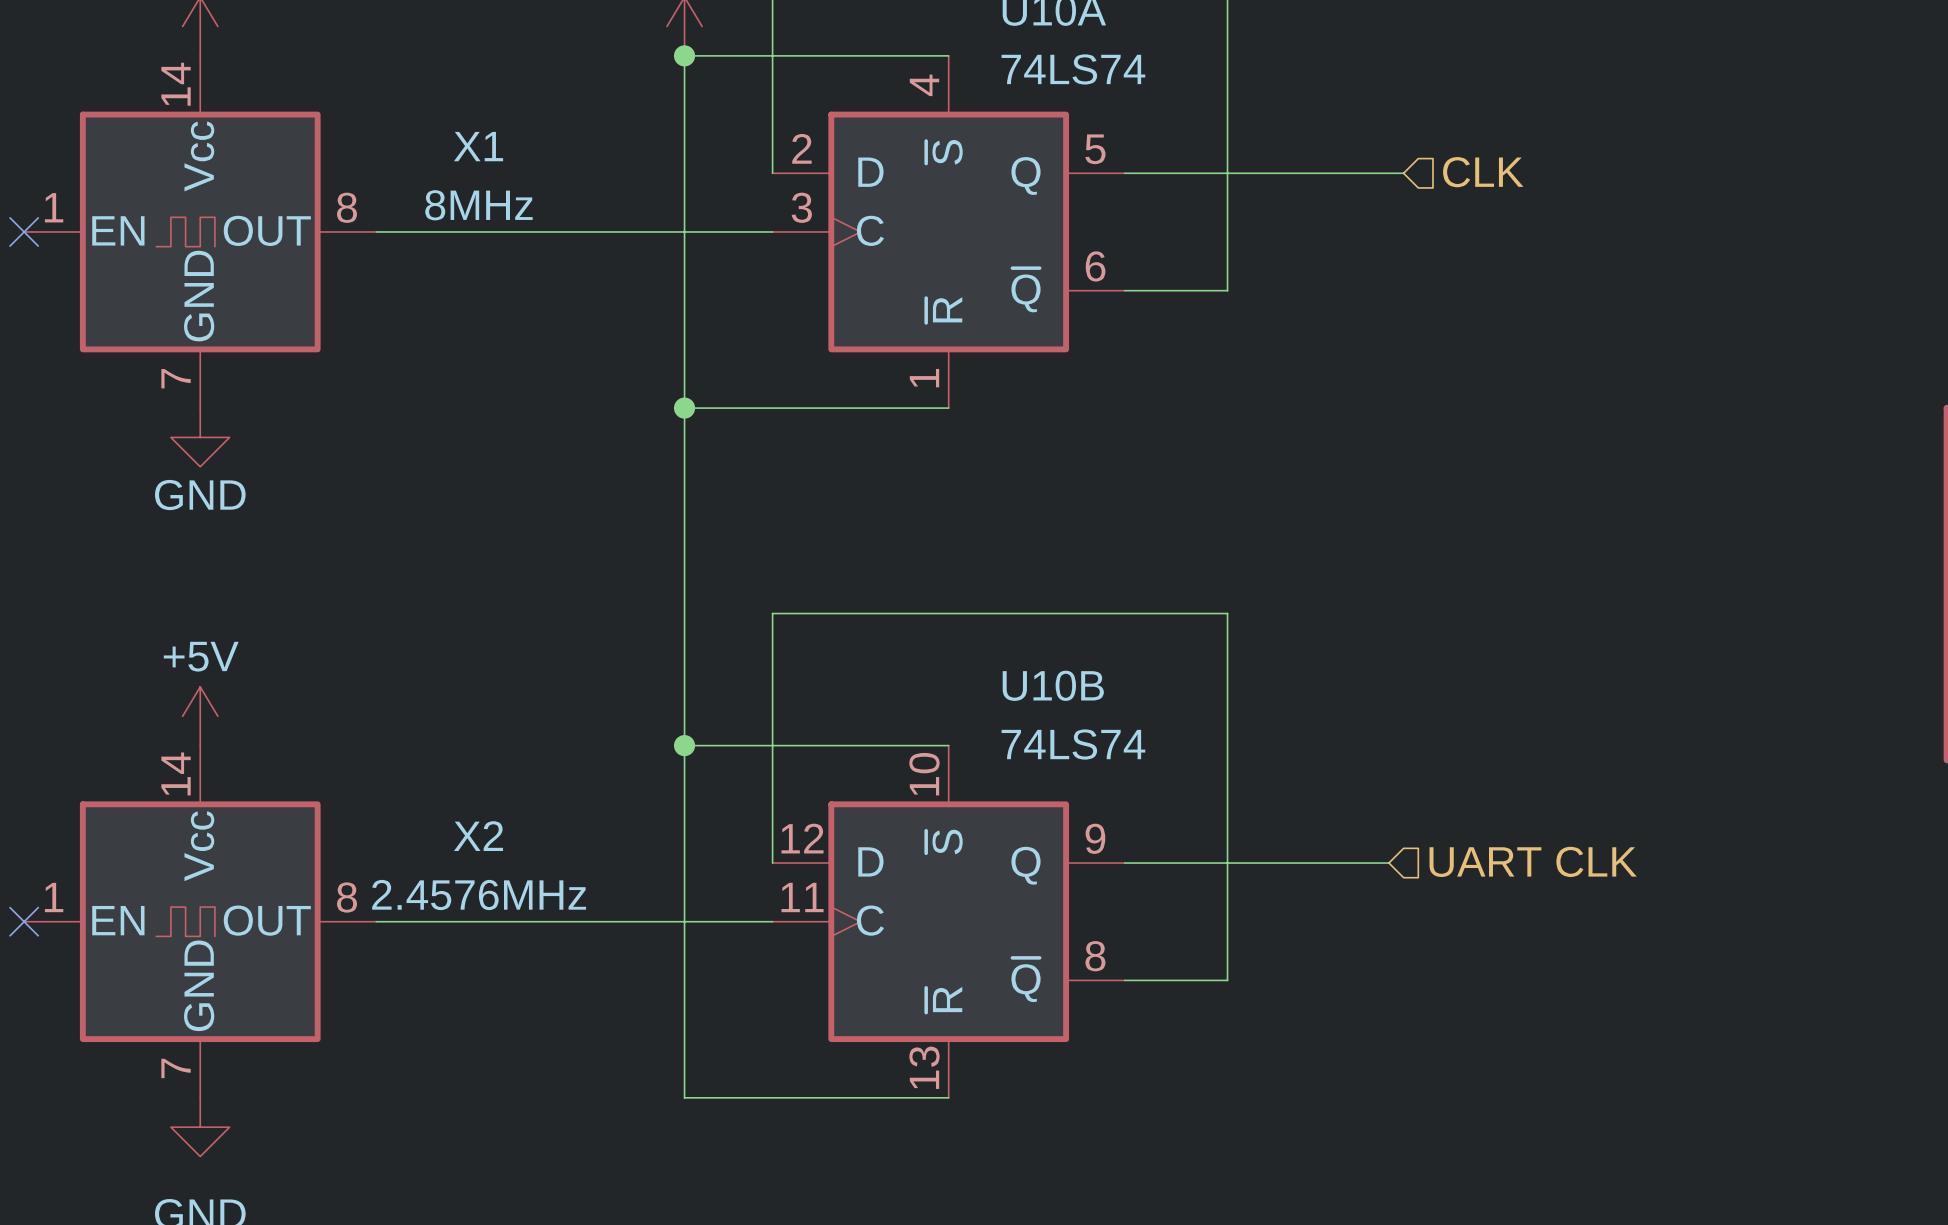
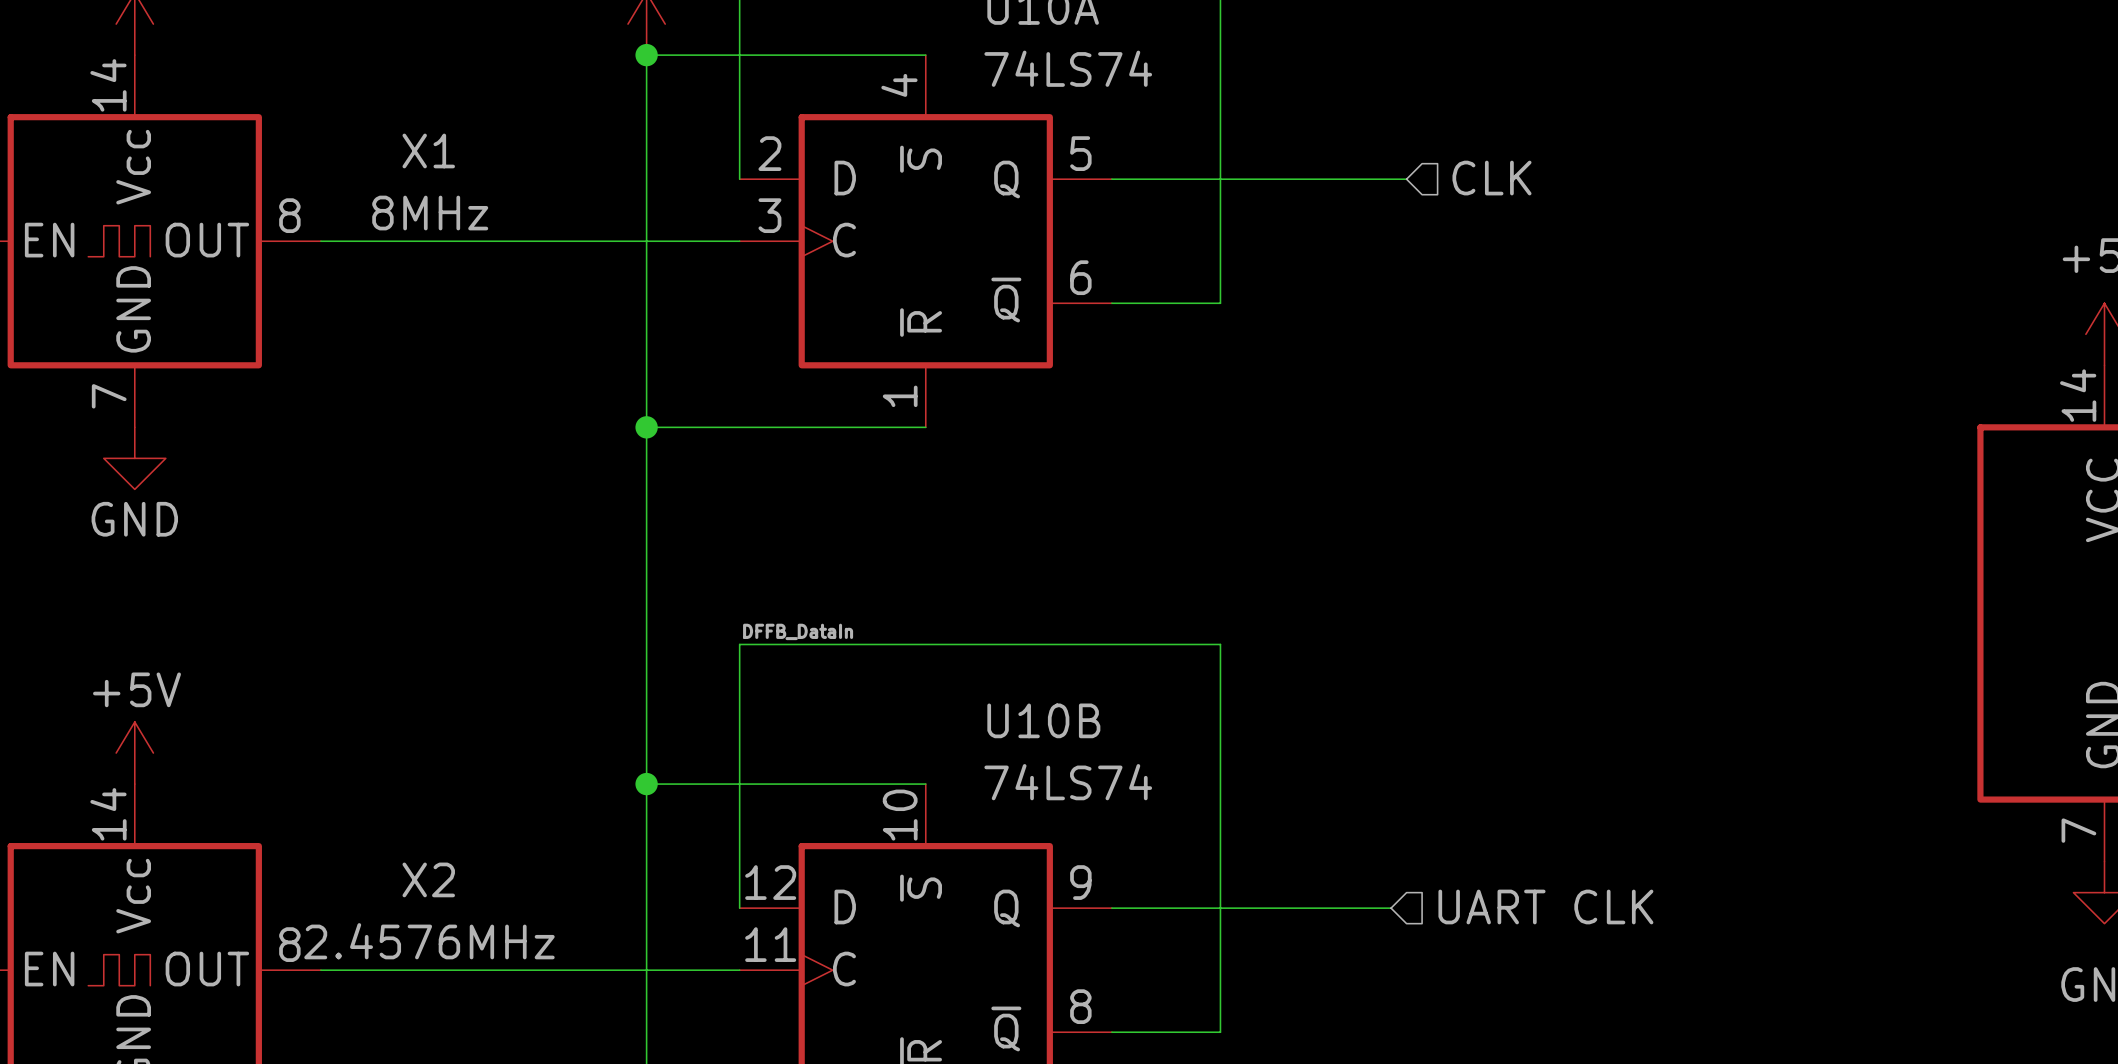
label: none -> DFFB_DataIn (798, 631)

